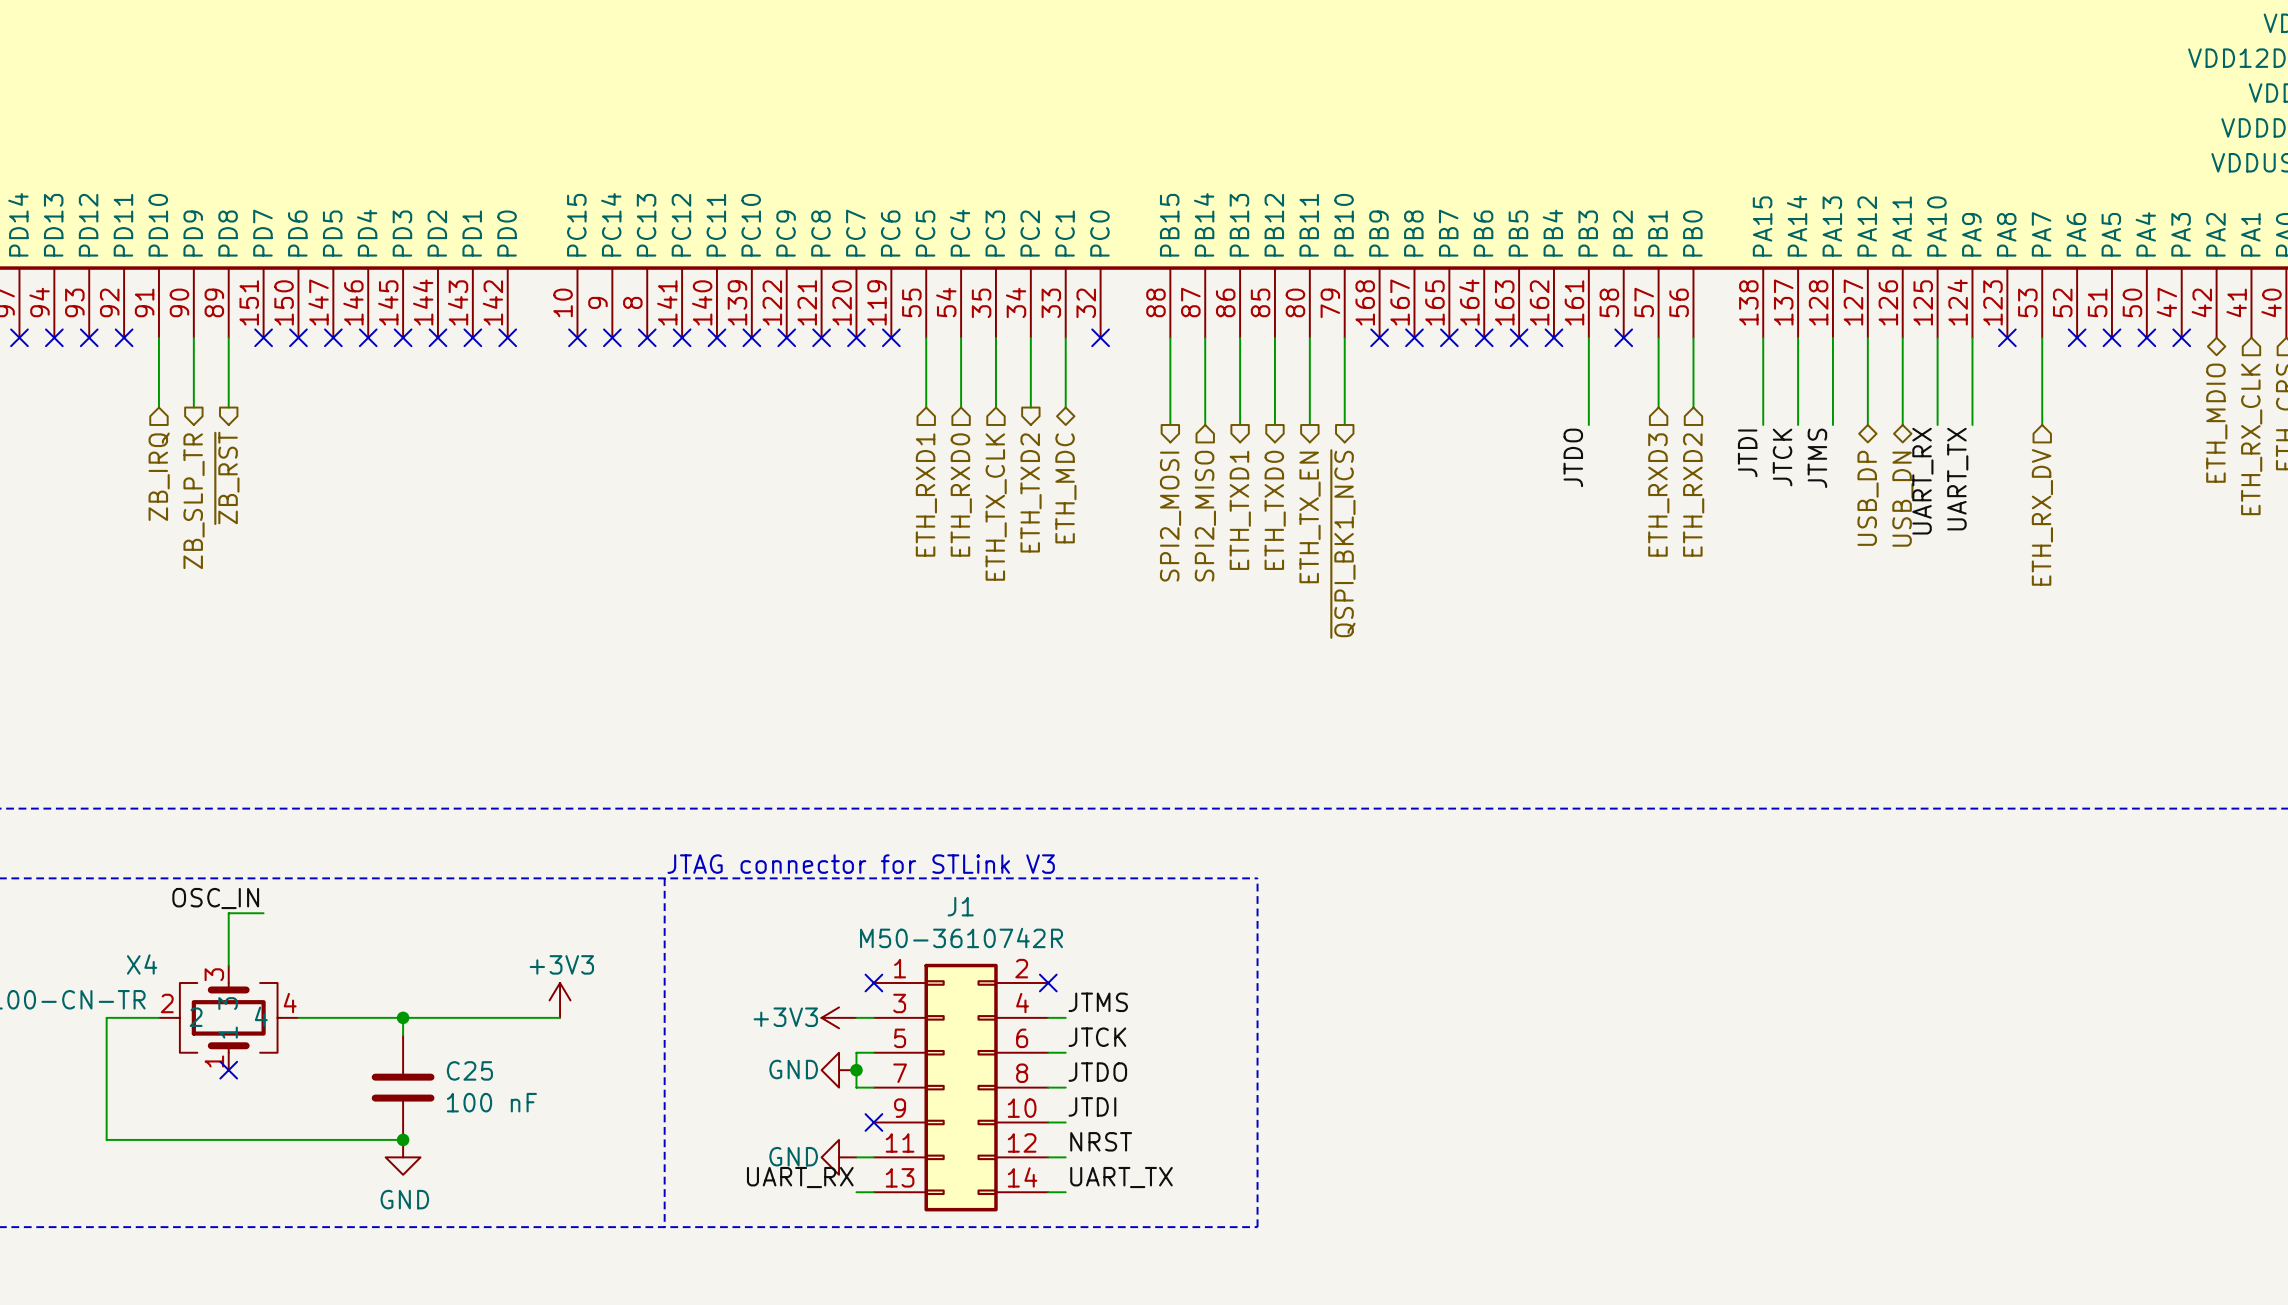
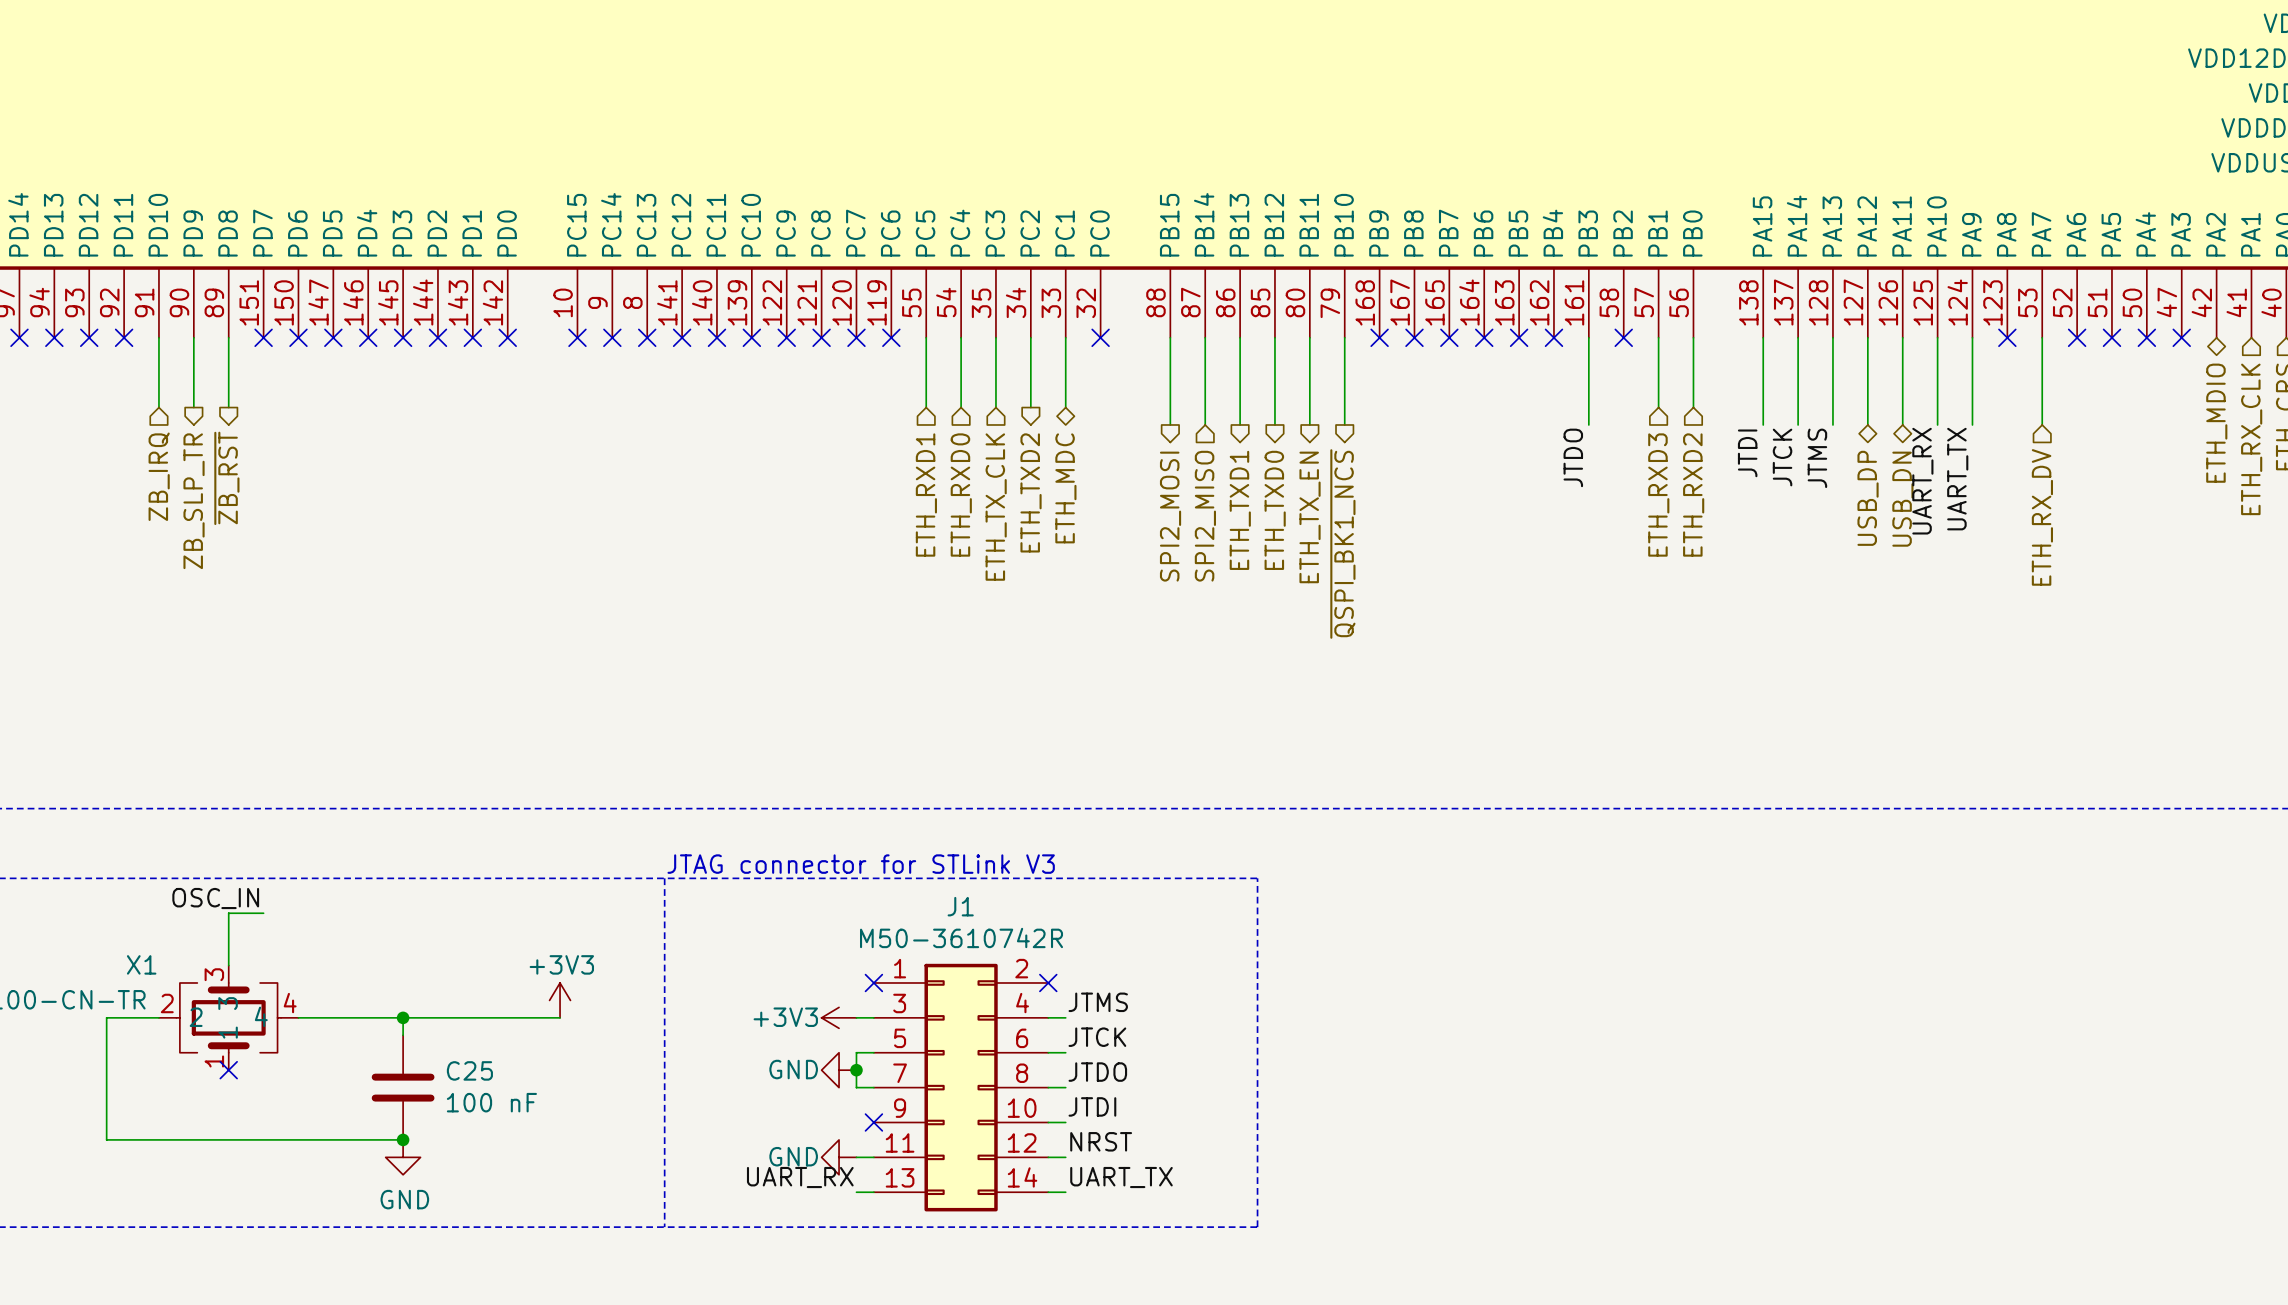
X4 name: X4 (142, 964) -> X1 (141, 964)

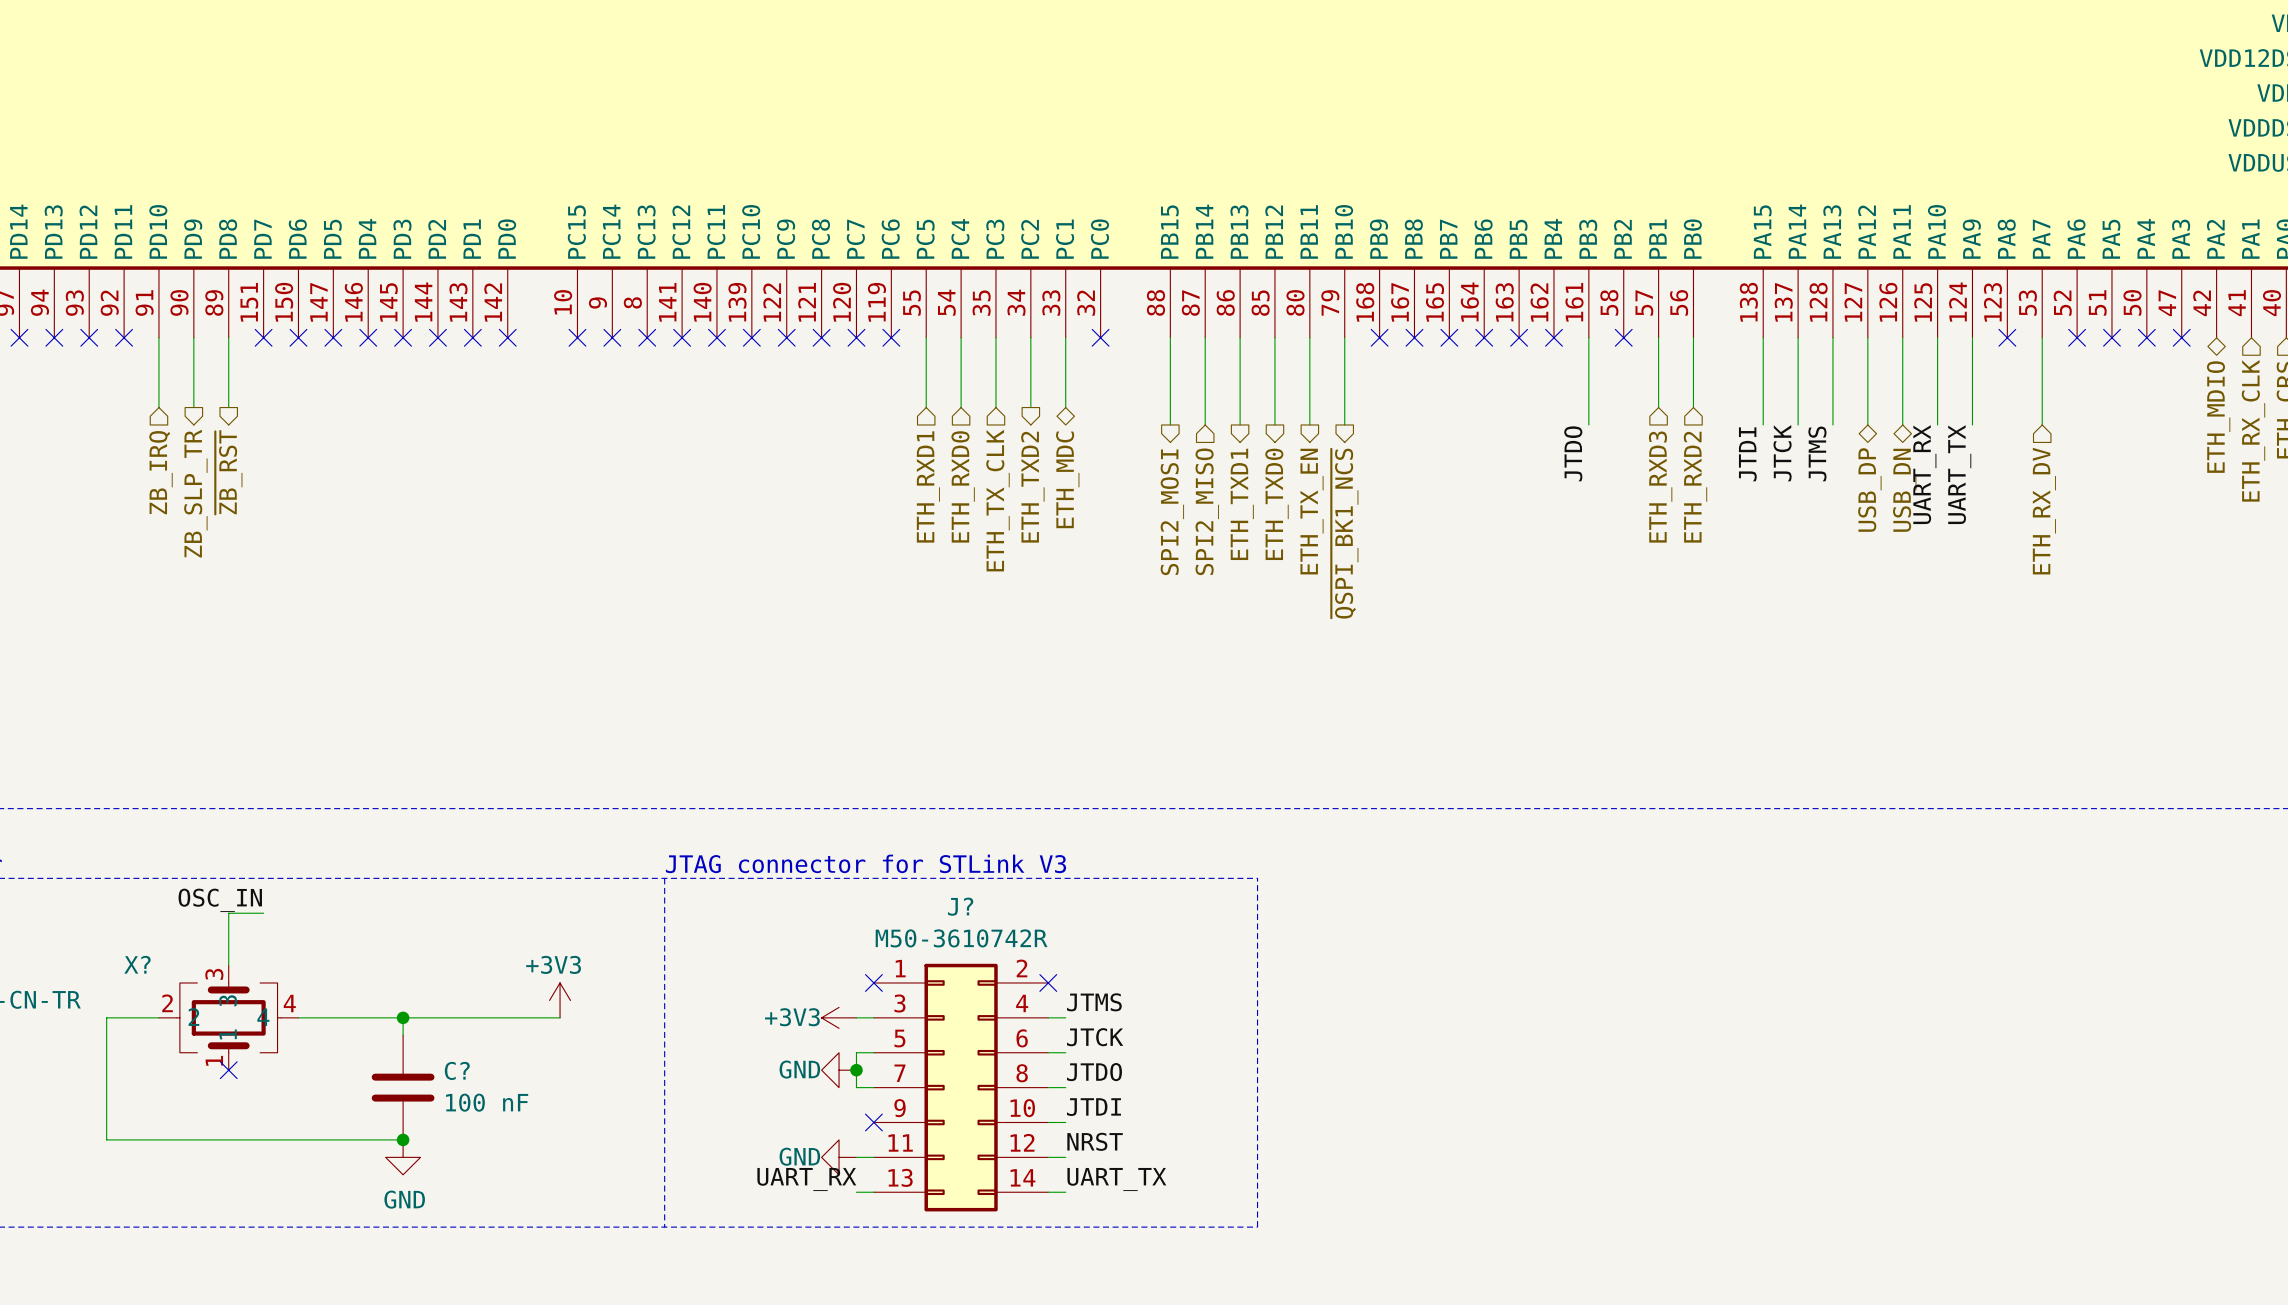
J1 name: J1 (960, 906) -> J? (960, 906)
X1 name: X1 (141, 964) -> X? (137, 964)
C25 name: C25 (469, 1070) -> C? (457, 1070)

